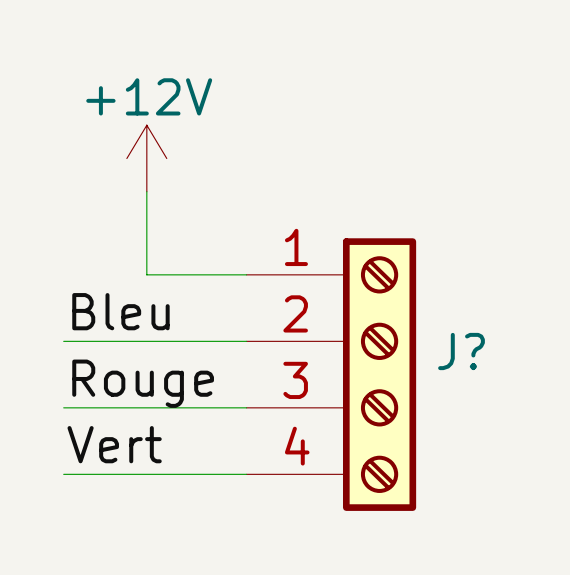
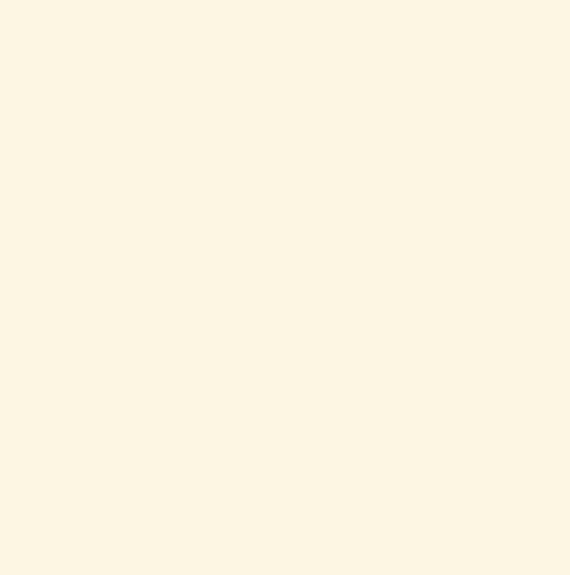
power symbol: +12V (146, 158) -> none
wire: (146, 191) (146, 274) (246, 274) -> none
label: Bleu (120, 311) -> none
wire: (63, 341) (246, 341) -> none
J?: (331, 374) -> none
label: Rouge (143, 383) -> none
wire: (63, 407) (246, 407) -> none
label: Vert (114, 444) -> none
wire: (63, 474) (246, 474) -> none

